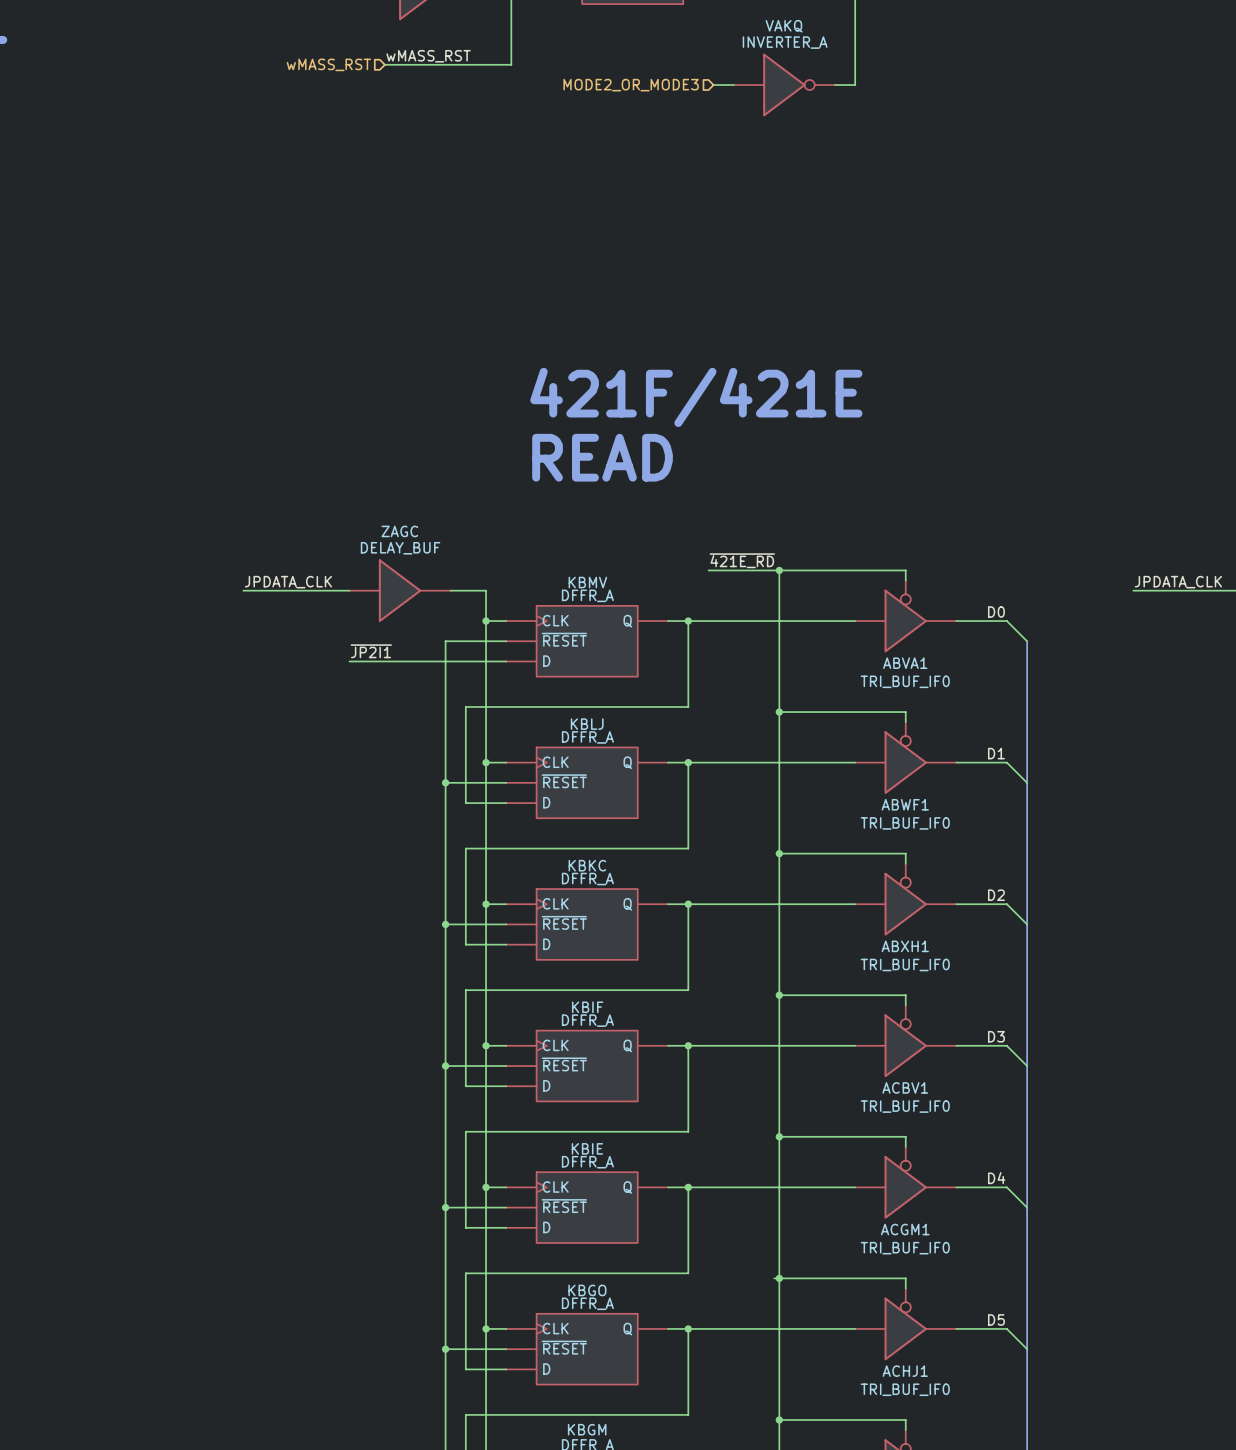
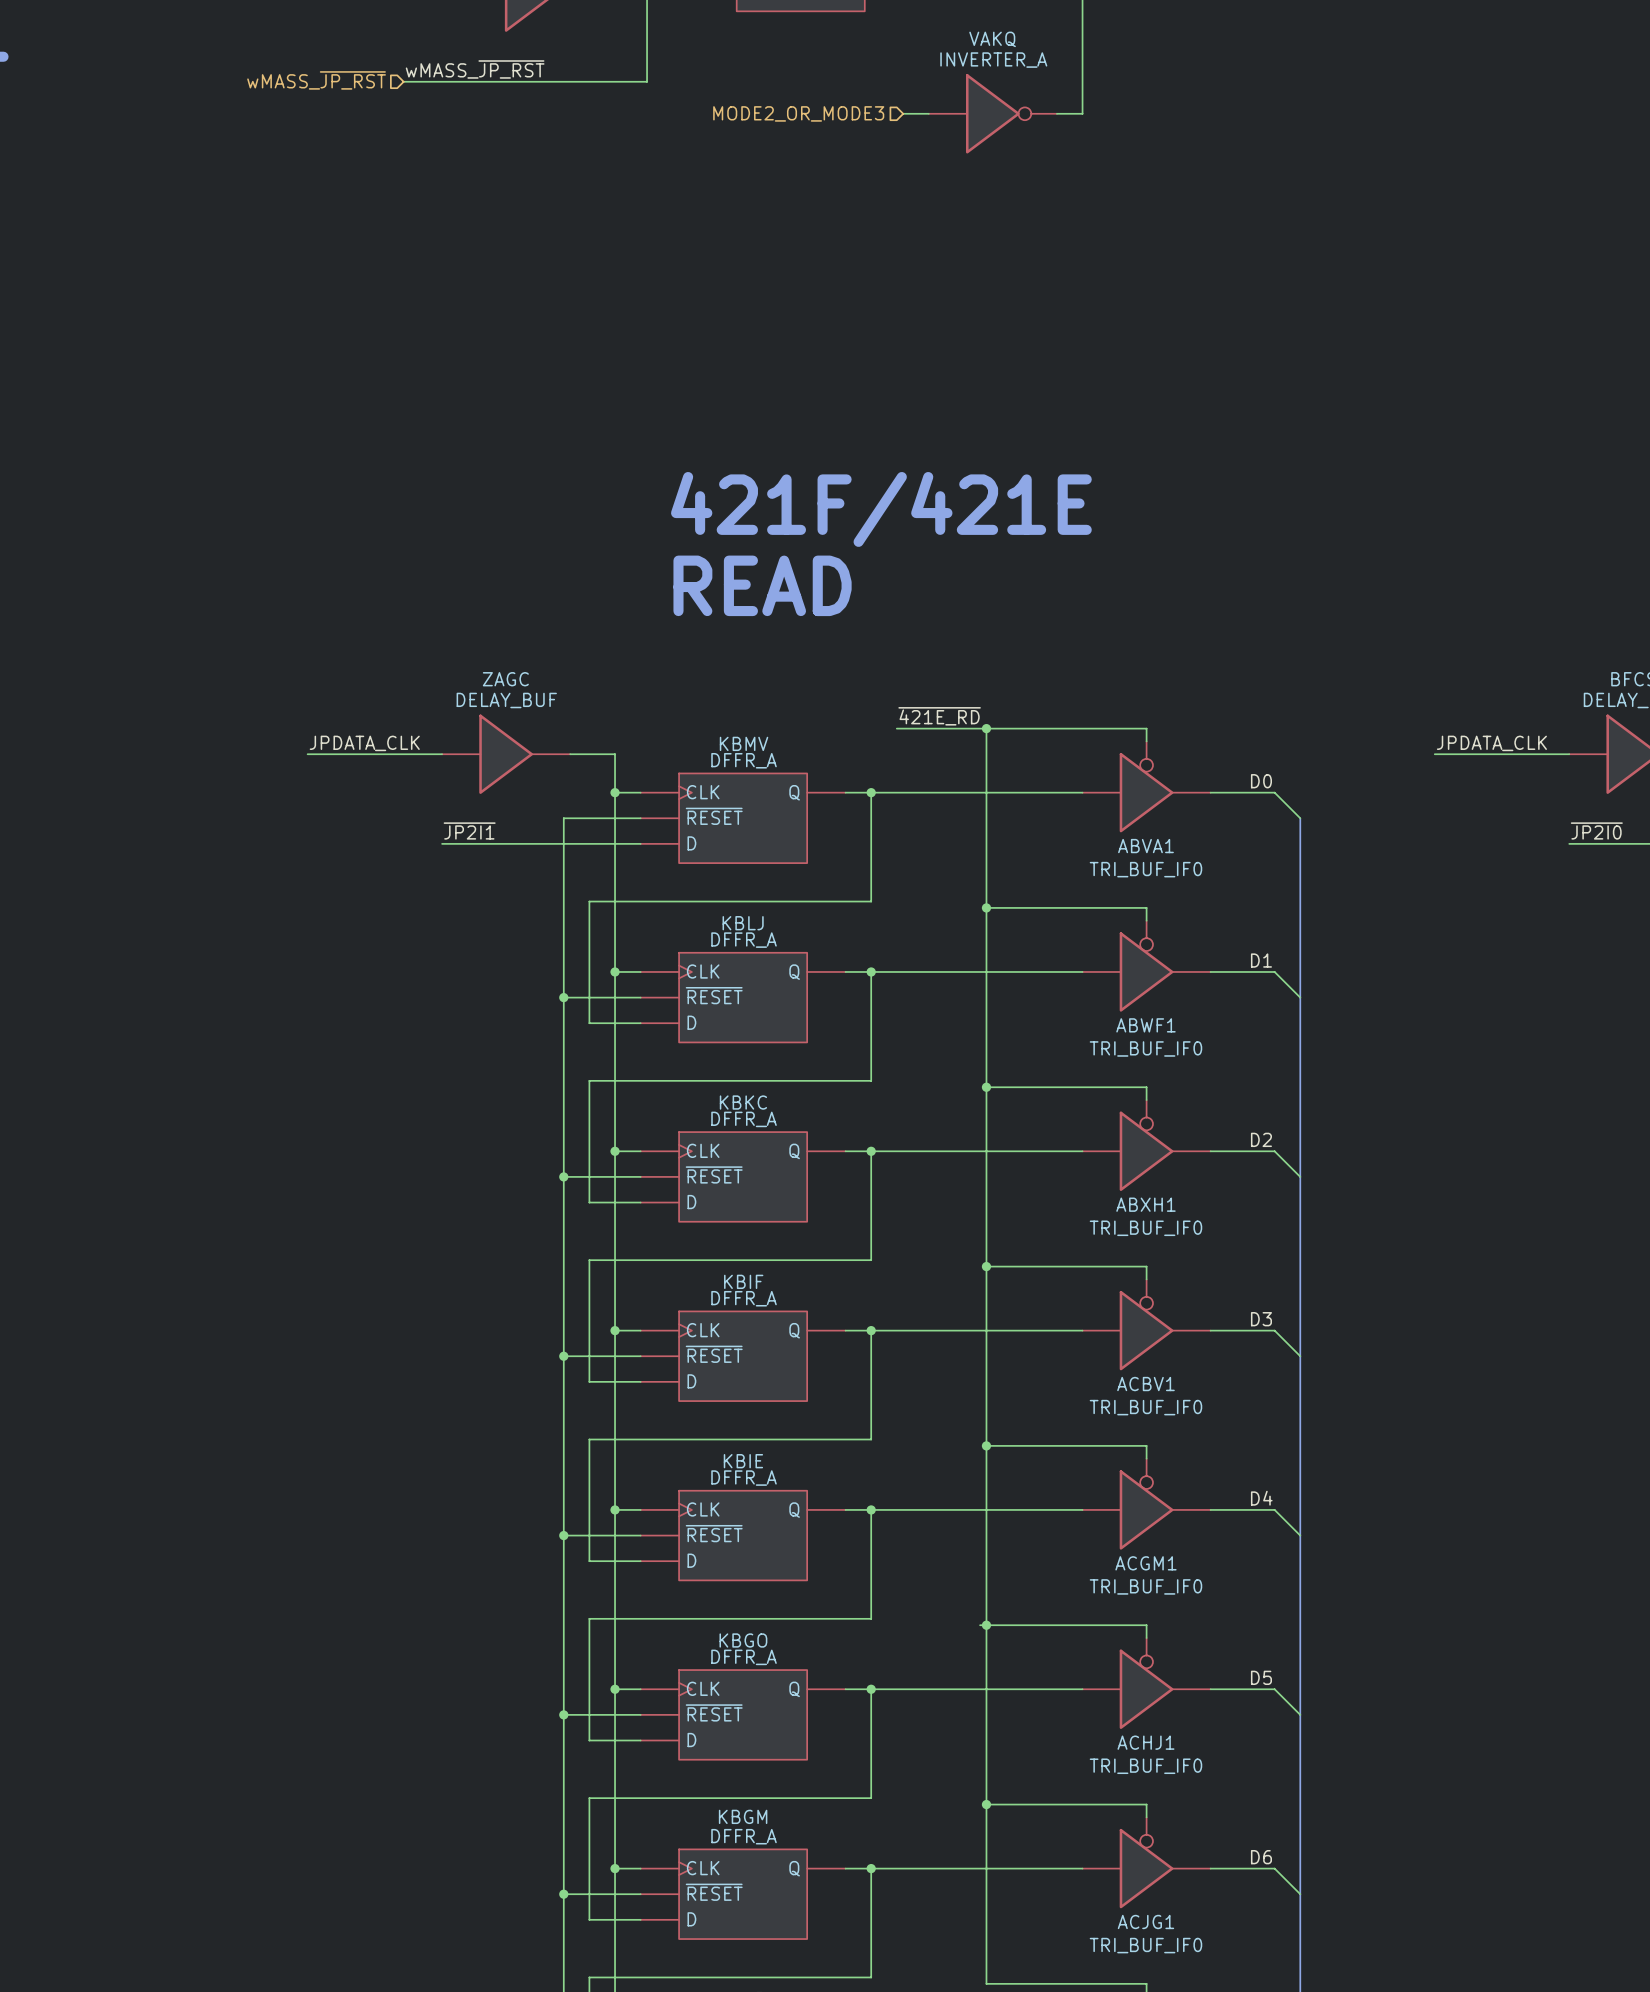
label: wMASS_RST (428, 56) -> wMASS_~{JP_RST} (475, 69)
wire: (511, 59) (511, 64) (384, 64) -> (647, 81) (403, 81)
hierarchical label: wMASS_RST (328, 64) -> wMASS_~{JP_RST} (316, 80)

